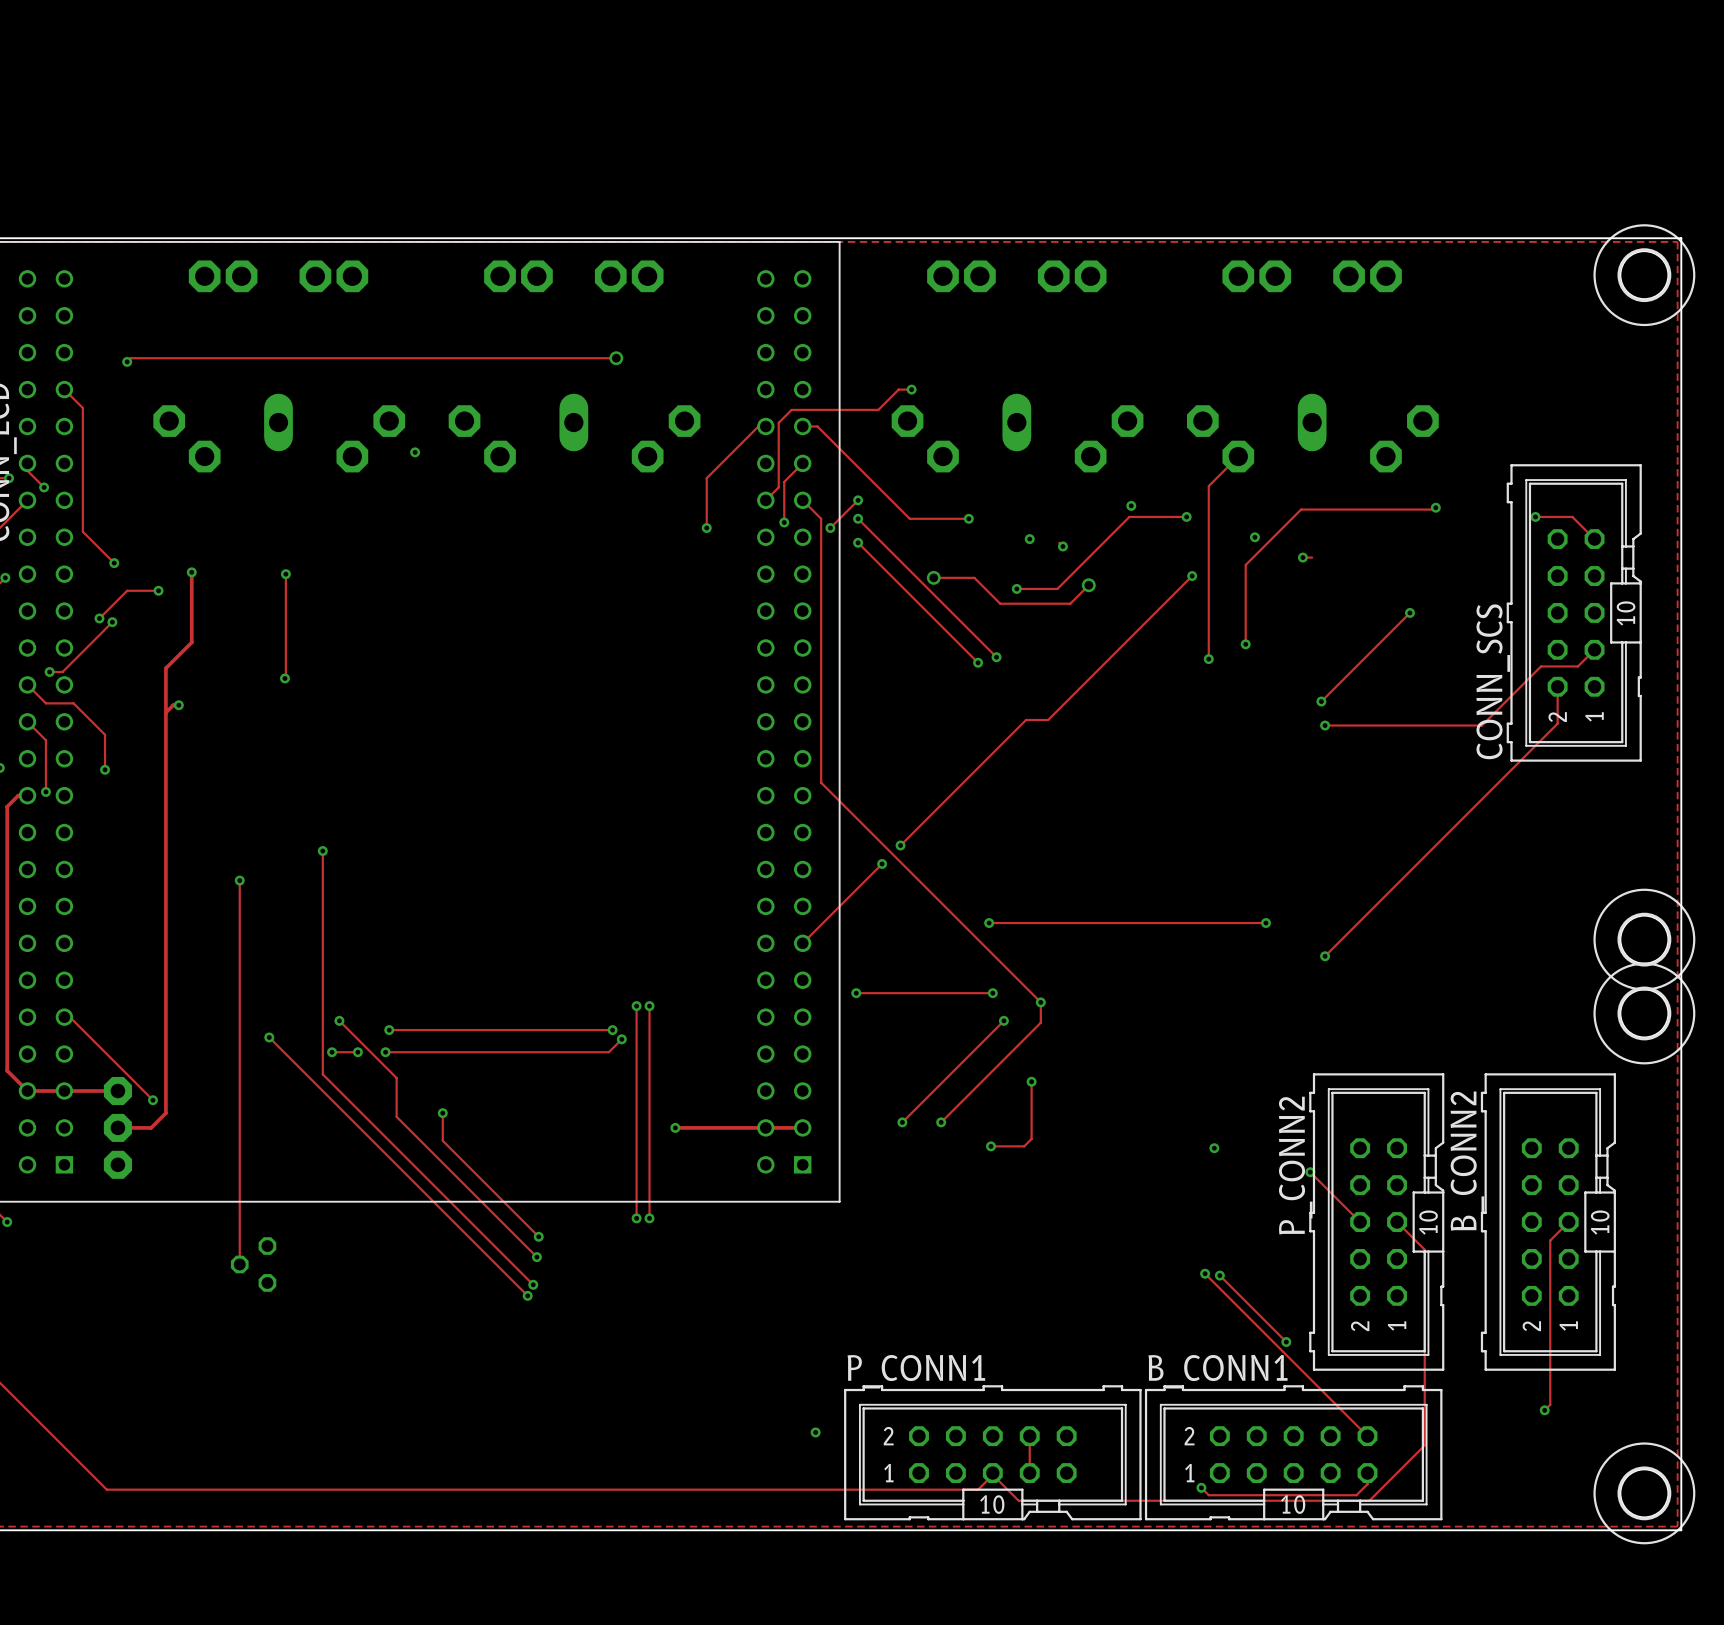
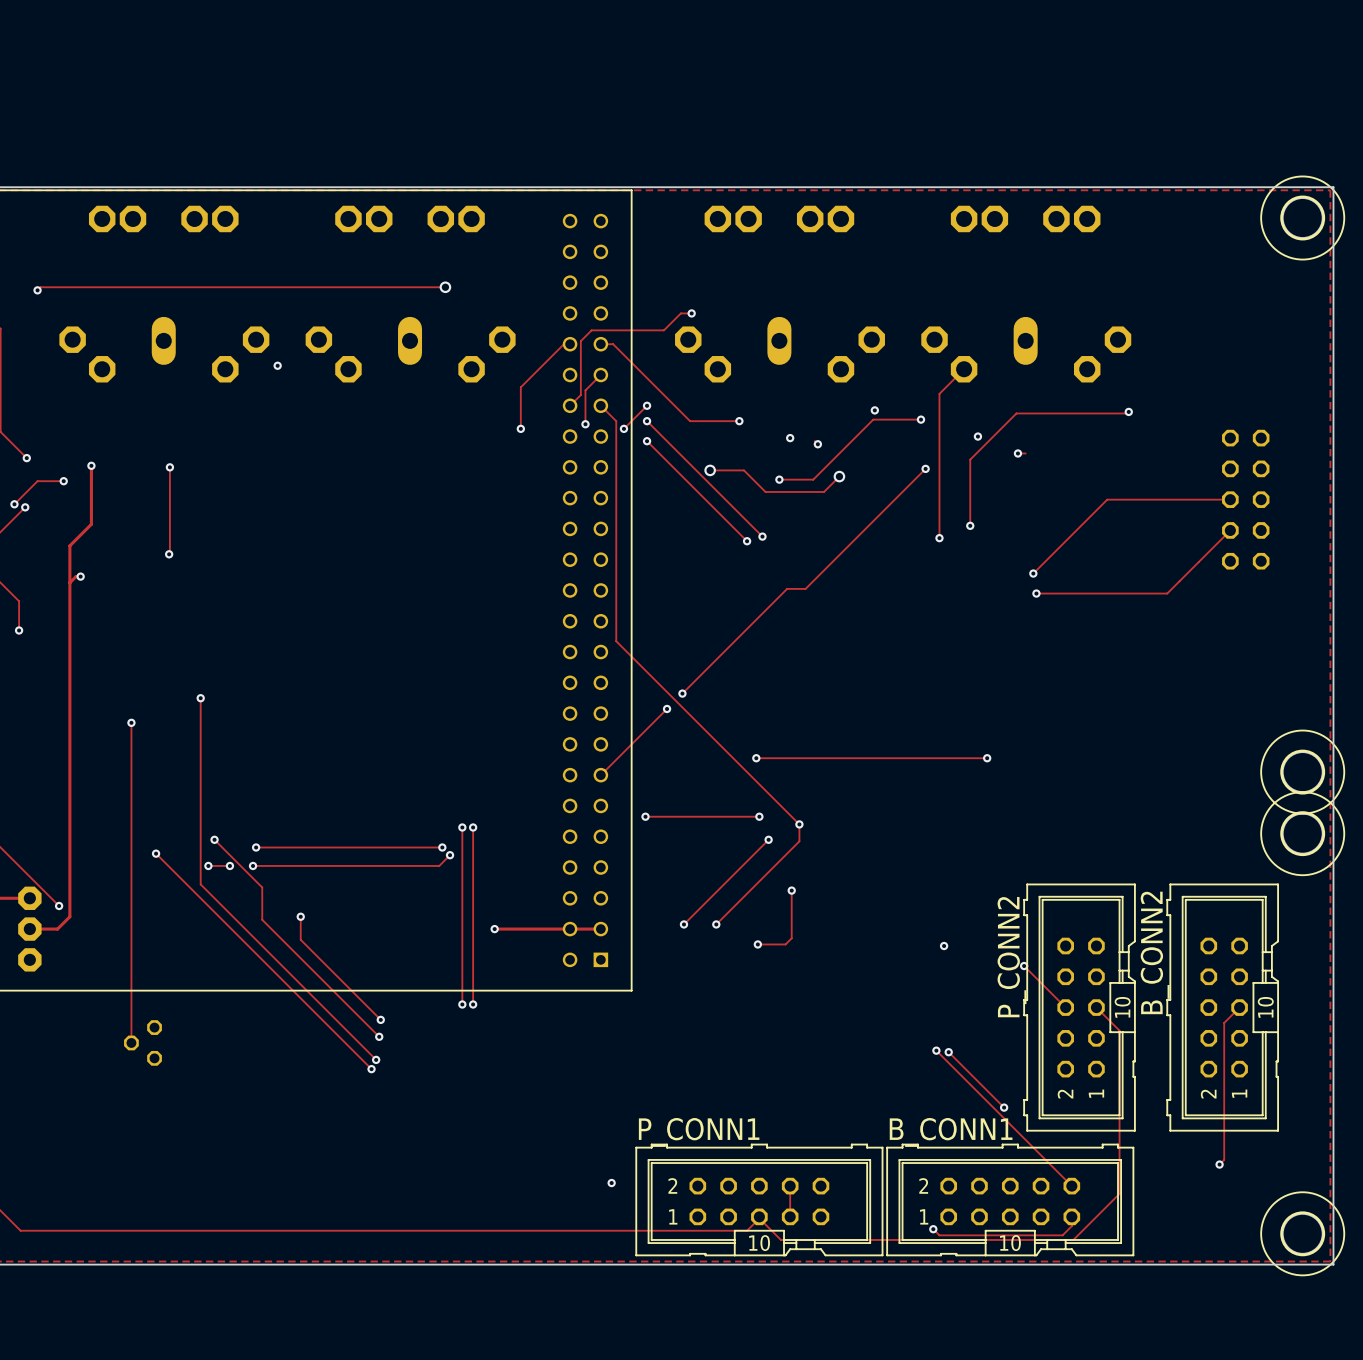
track: (1535, 516) (1572, 516) (1594, 539) -> none
via: (1535, 516) -> none
track: none -> (1107, 499) (1230, 499)
via: (1409, 612) -> none
CONN_SCS side: top (1574, 612) -> bottom (1245, 499)
track: (1594, 649) (1577, 666) (1541, 666) -> (1230, 530) (1216, 544)
track: (1557, 686) (1557, 723) (1325, 956) -> none
via: (1325, 956) -> none

